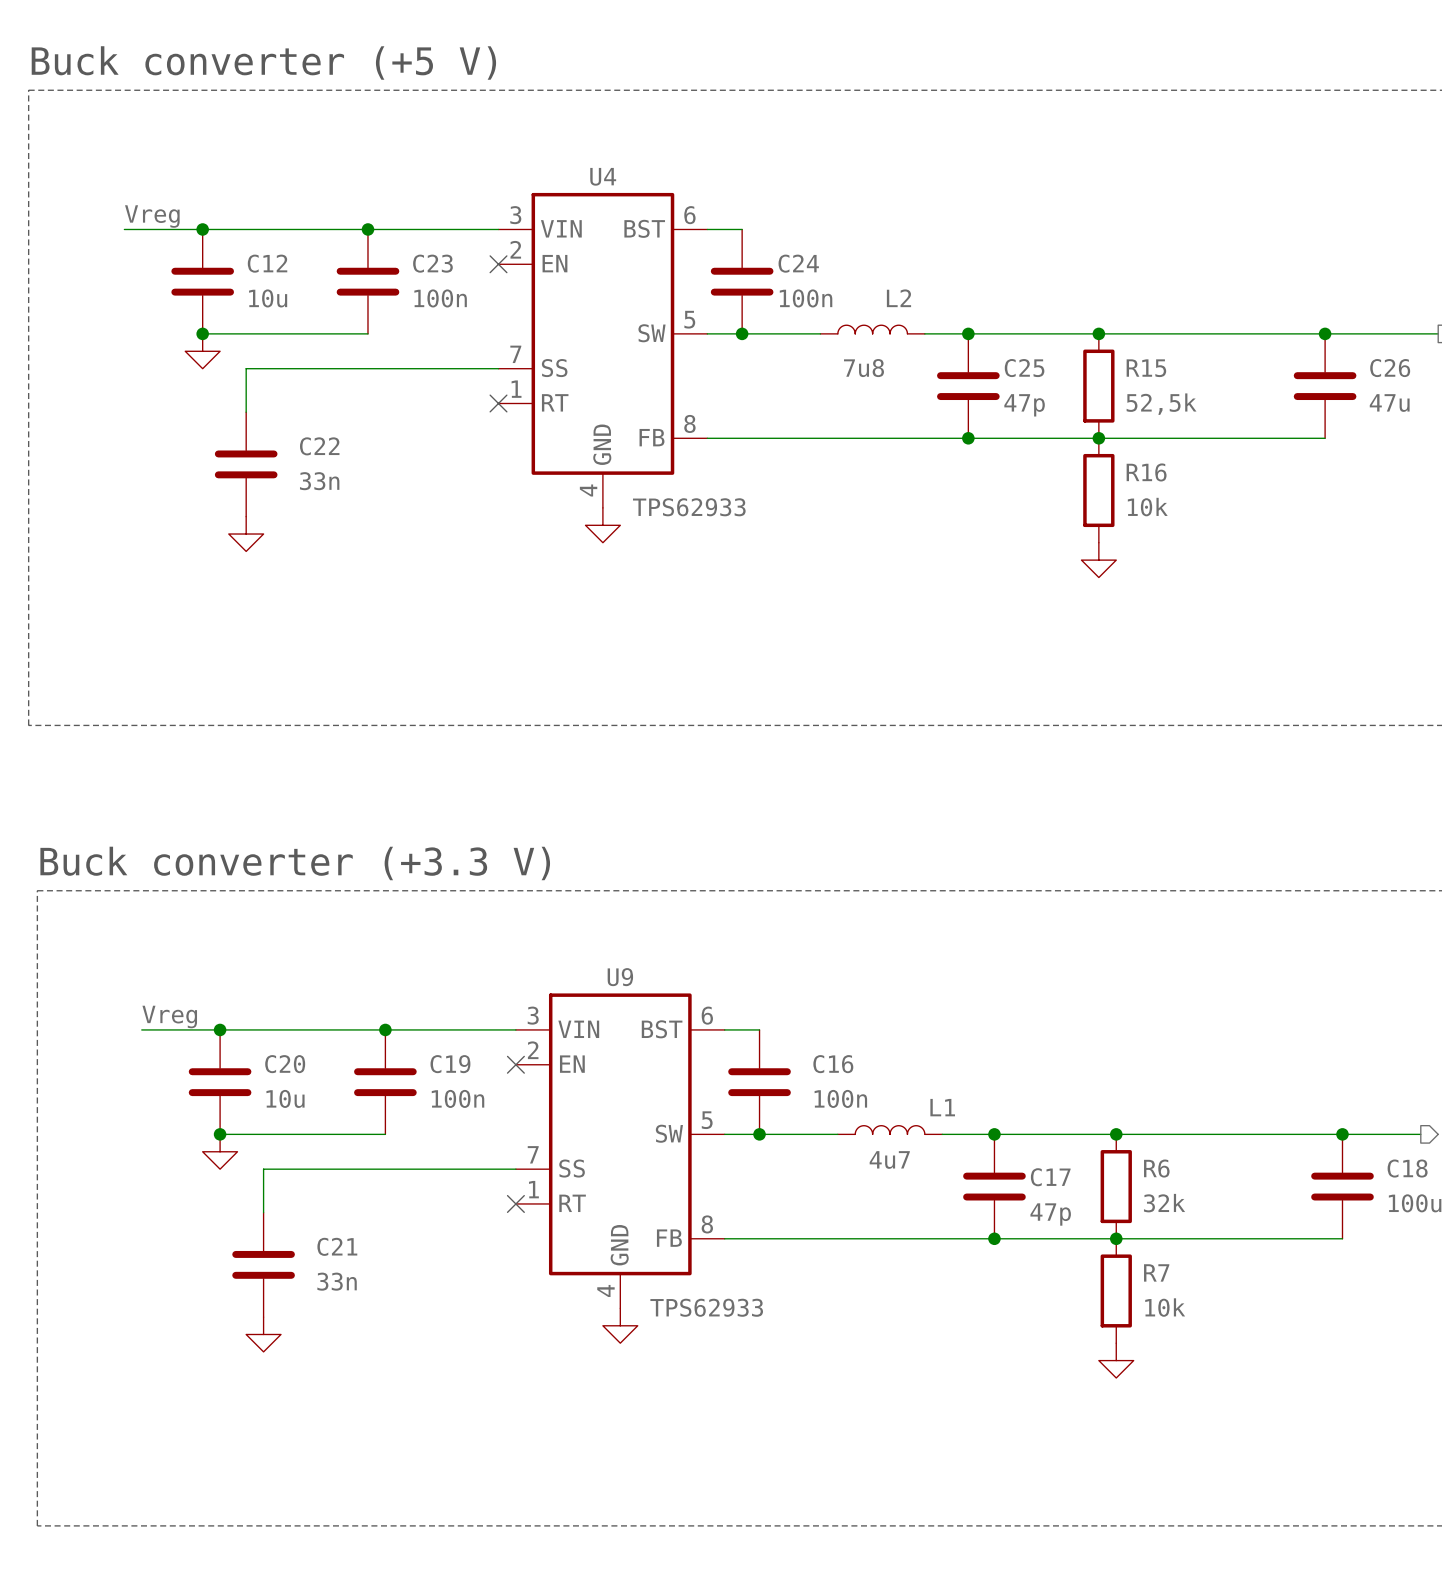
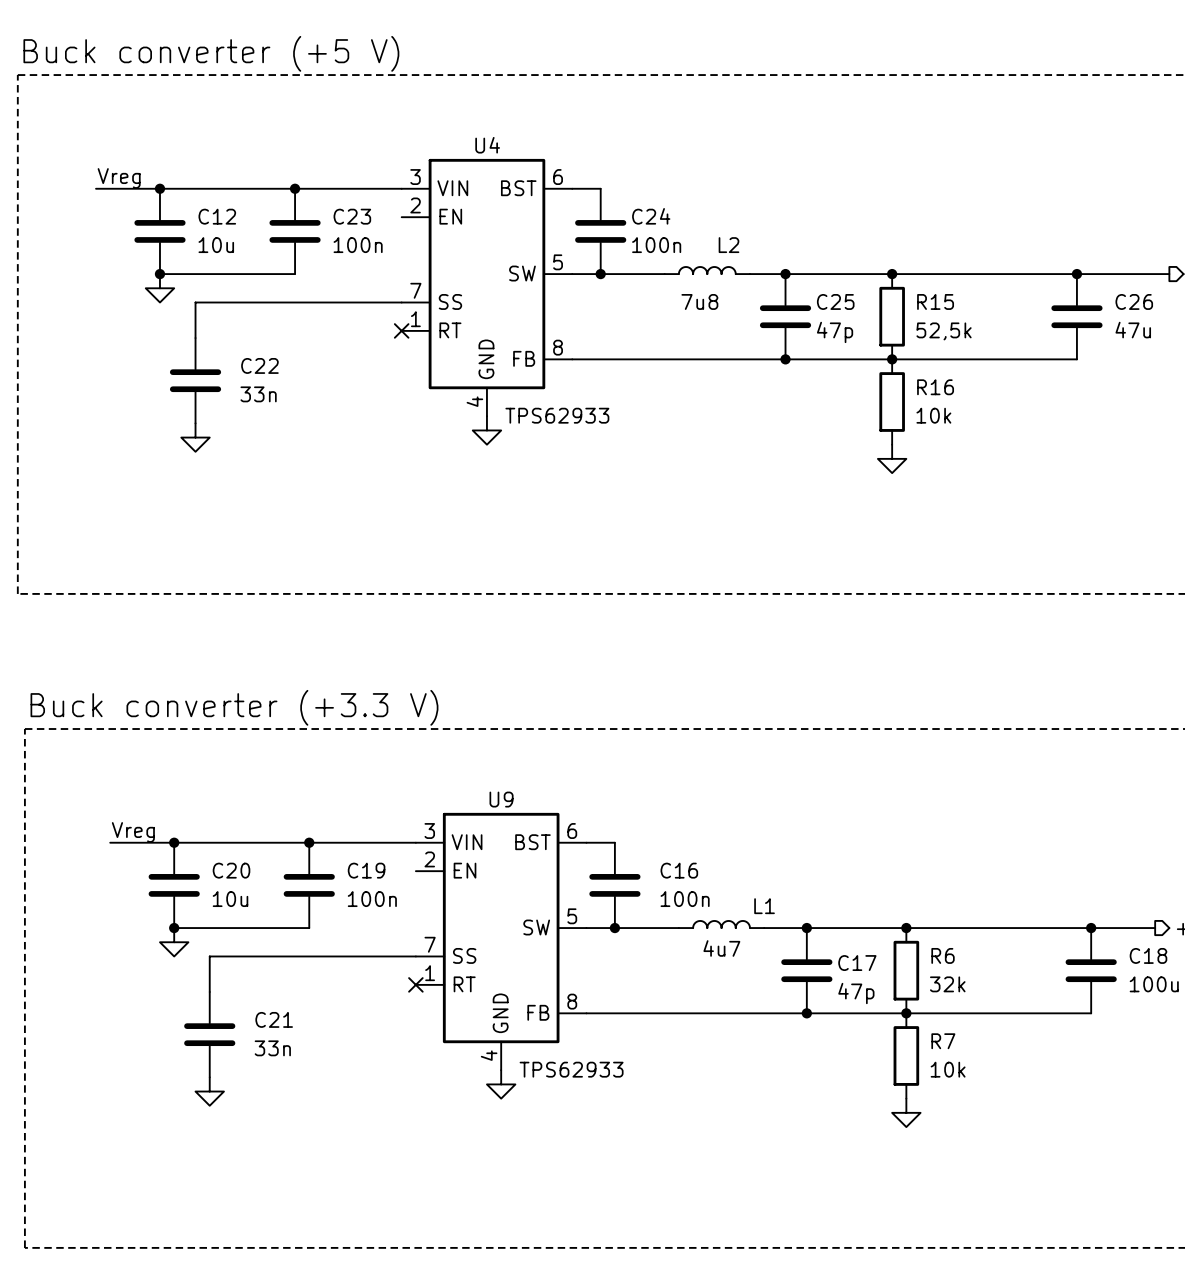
no-connect mark: (498, 264) -> none
no-connect mark: (515, 1064) -> none

